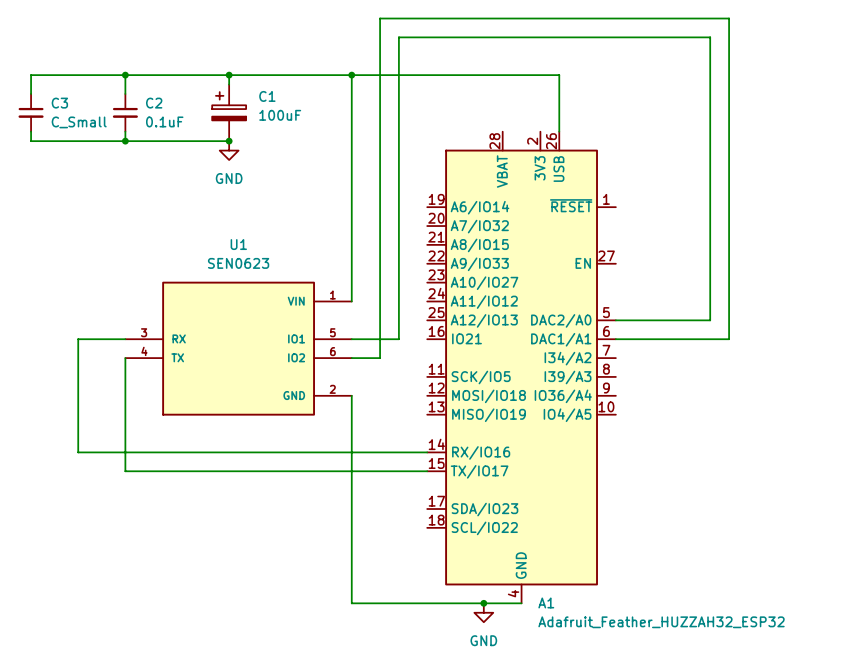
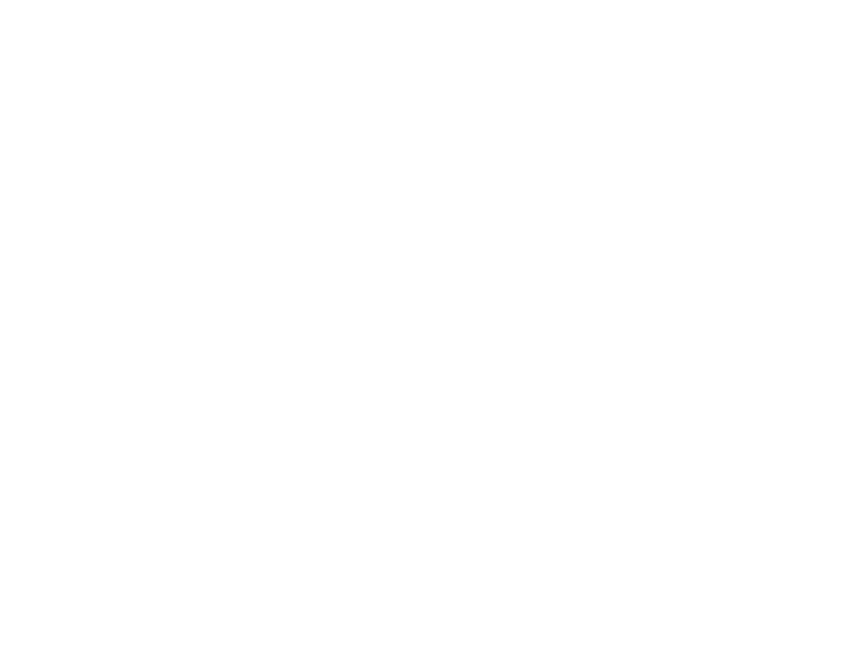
wire: (125, 75) (125, 93) -> none
junction: (125, 75) -> none
wire: (229, 75) (229, 84) -> none
junction: (229, 75) -> none
wire: (351, 75) (351, 301) -> none
junction: (351, 75) -> none
wire: (31, 93) (31, 75) (559, 75) (559, 131) -> none
C3: C_Small (31, 112) -> none
C2: 0.1uF (125, 112) -> none
C1: 100uF (229, 112) -> none
wire: (31, 131) (31, 141) (229, 141) -> none
wire: (125, 131) (125, 141) -> none
junction: (125, 141) -> none
junction: (229, 141) -> none
power symbol: GND (229, 150) -> none
wire: (615, 320) (710, 320) (710, 37) (398, 37) (398, 339) (351, 339) -> none
wire: (125, 339) (78, 339) (78, 452) (427, 452) -> none
wire: (615, 339) (729, 339) (729, 18) (380, 18) (380, 358) (351, 358) -> none
U1: SEN0623 (238, 348) -> none
wire: (125, 358) (125, 471) (427, 471) -> none
A1: Adafruit_Feather_HUZZAH32_ESP32 (521, 367) -> none
wire: (351, 395) (351, 603) (521, 603) -> none
junction: (483, 603) -> none
power symbol: GND (483, 612) -> none

